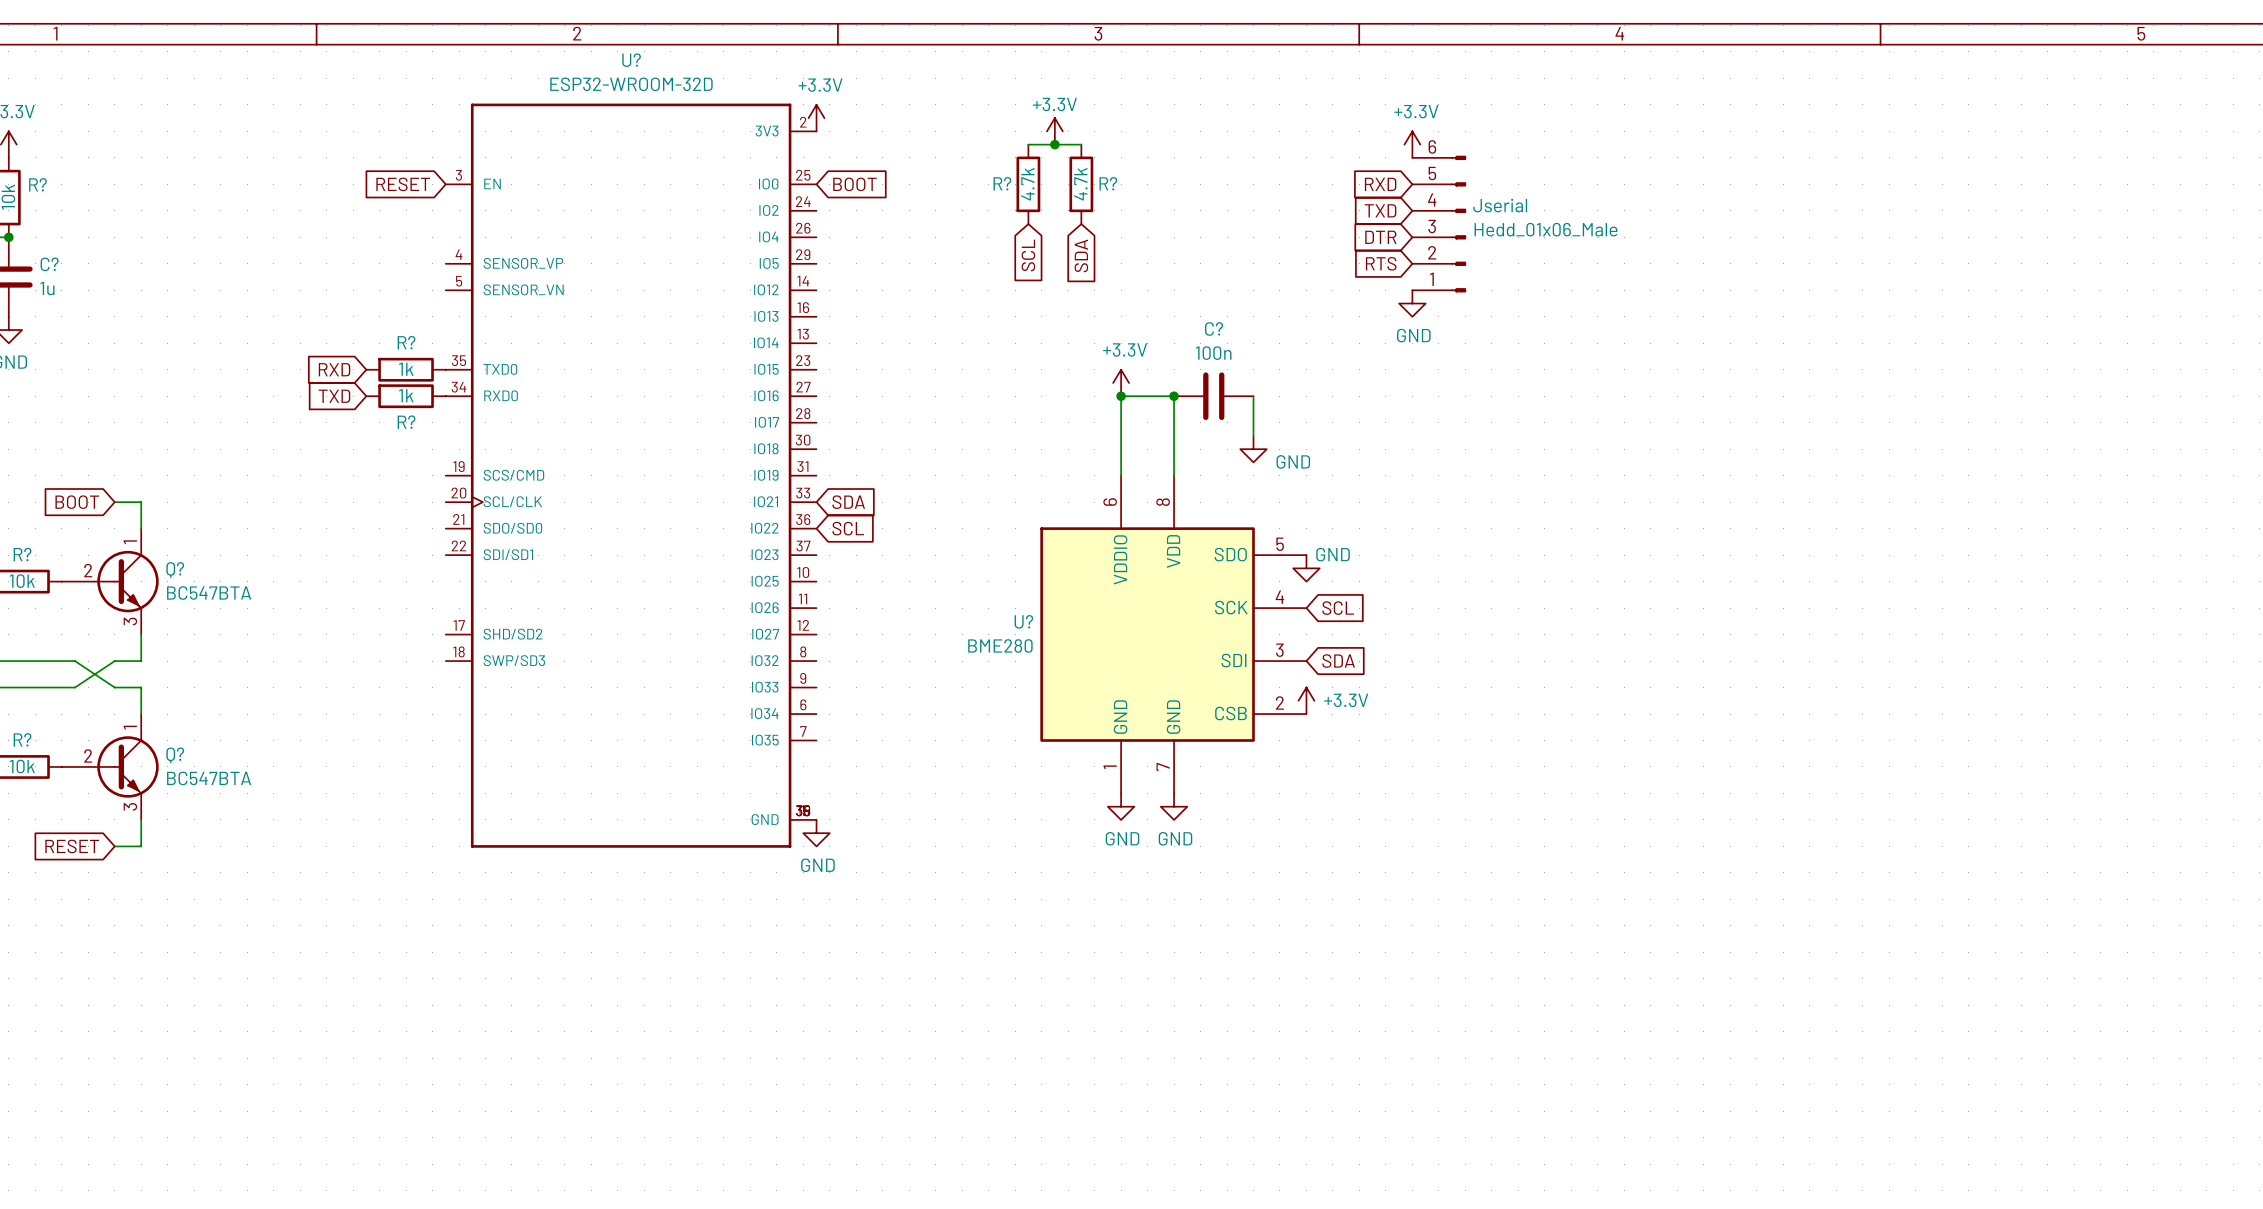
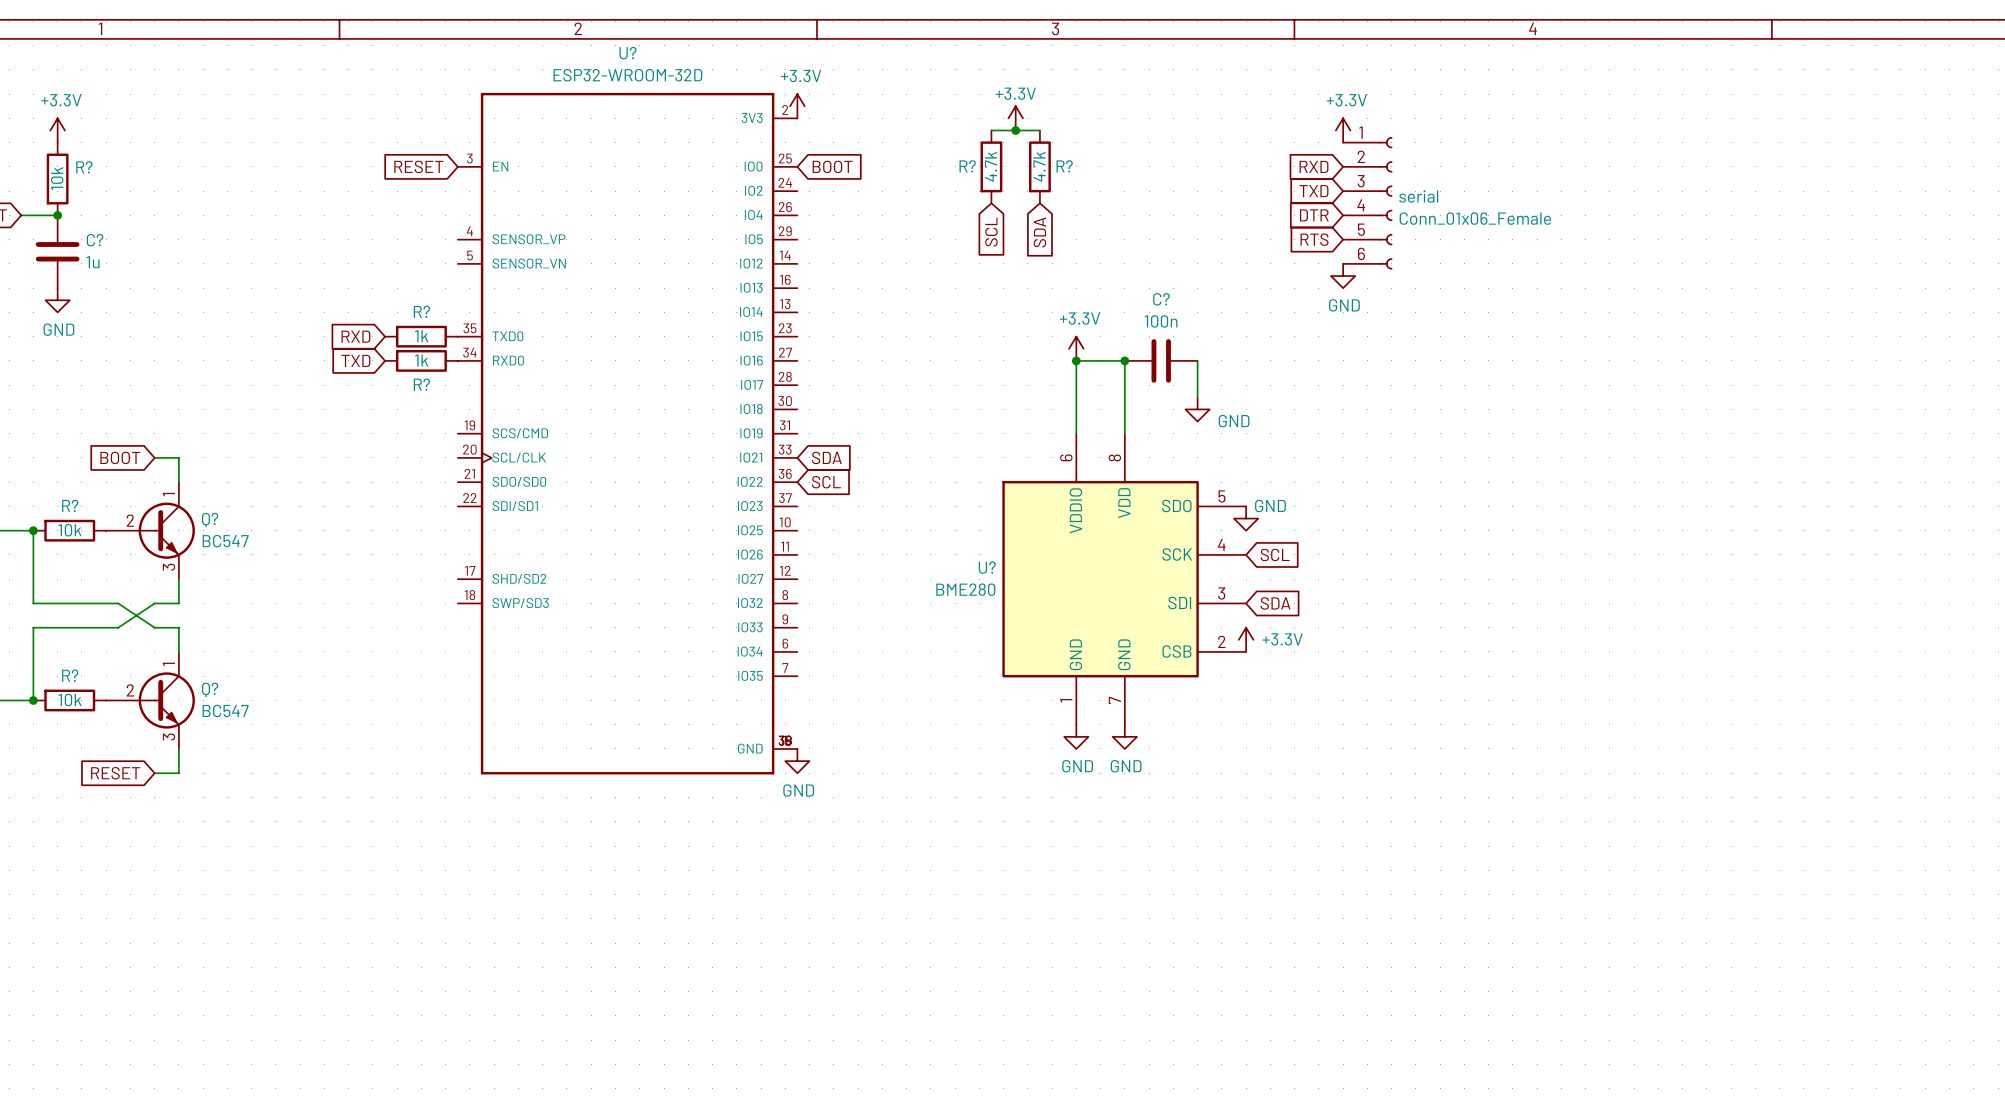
Jserial: Hedd_01x06_Male (1439, 224) -> none
serial: none -> Conn_01x06_Female (1367, 203)
Q? value: BC547BTA (209, 593) -> BC547 (225, 541)
Q? value: BC547BTA (209, 778) -> BC547 (225, 710)

